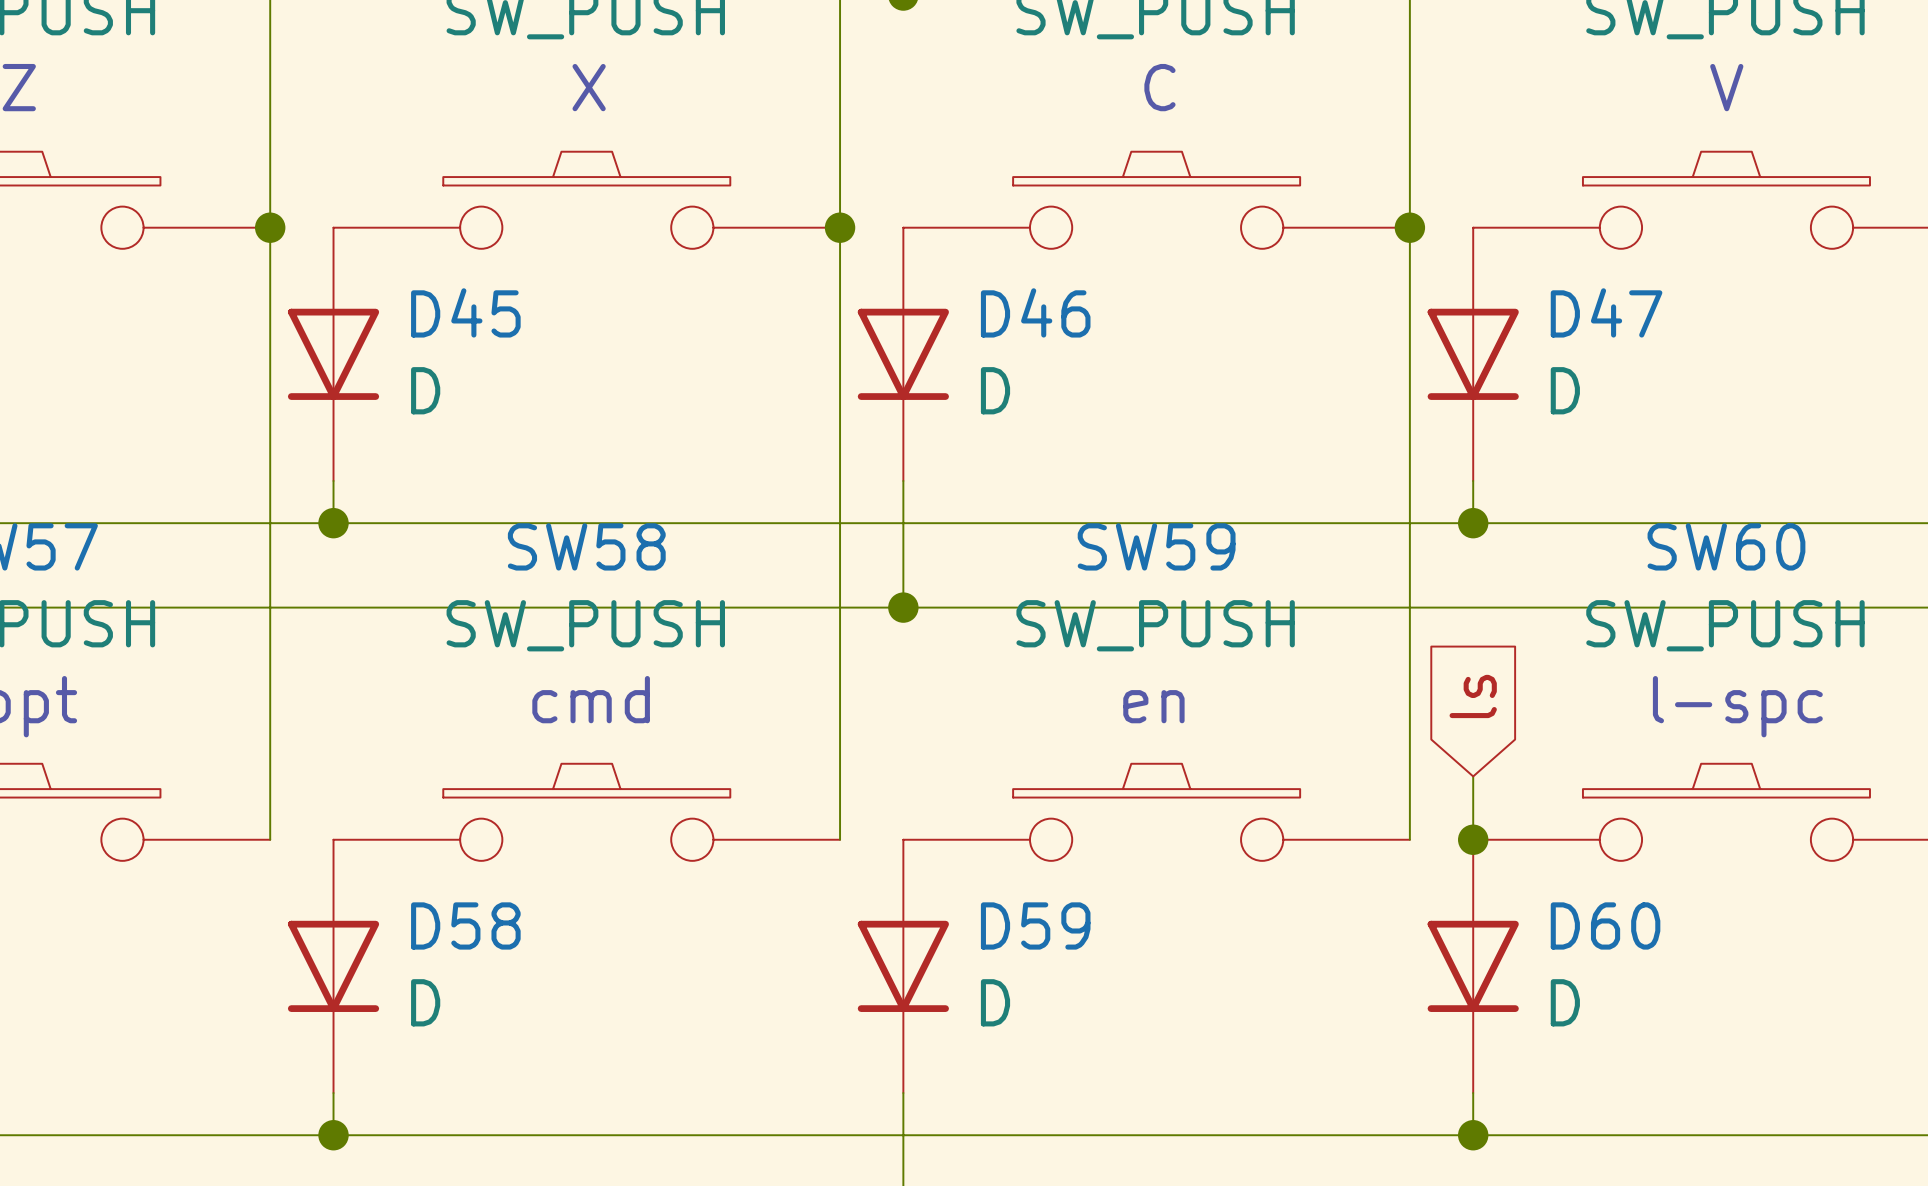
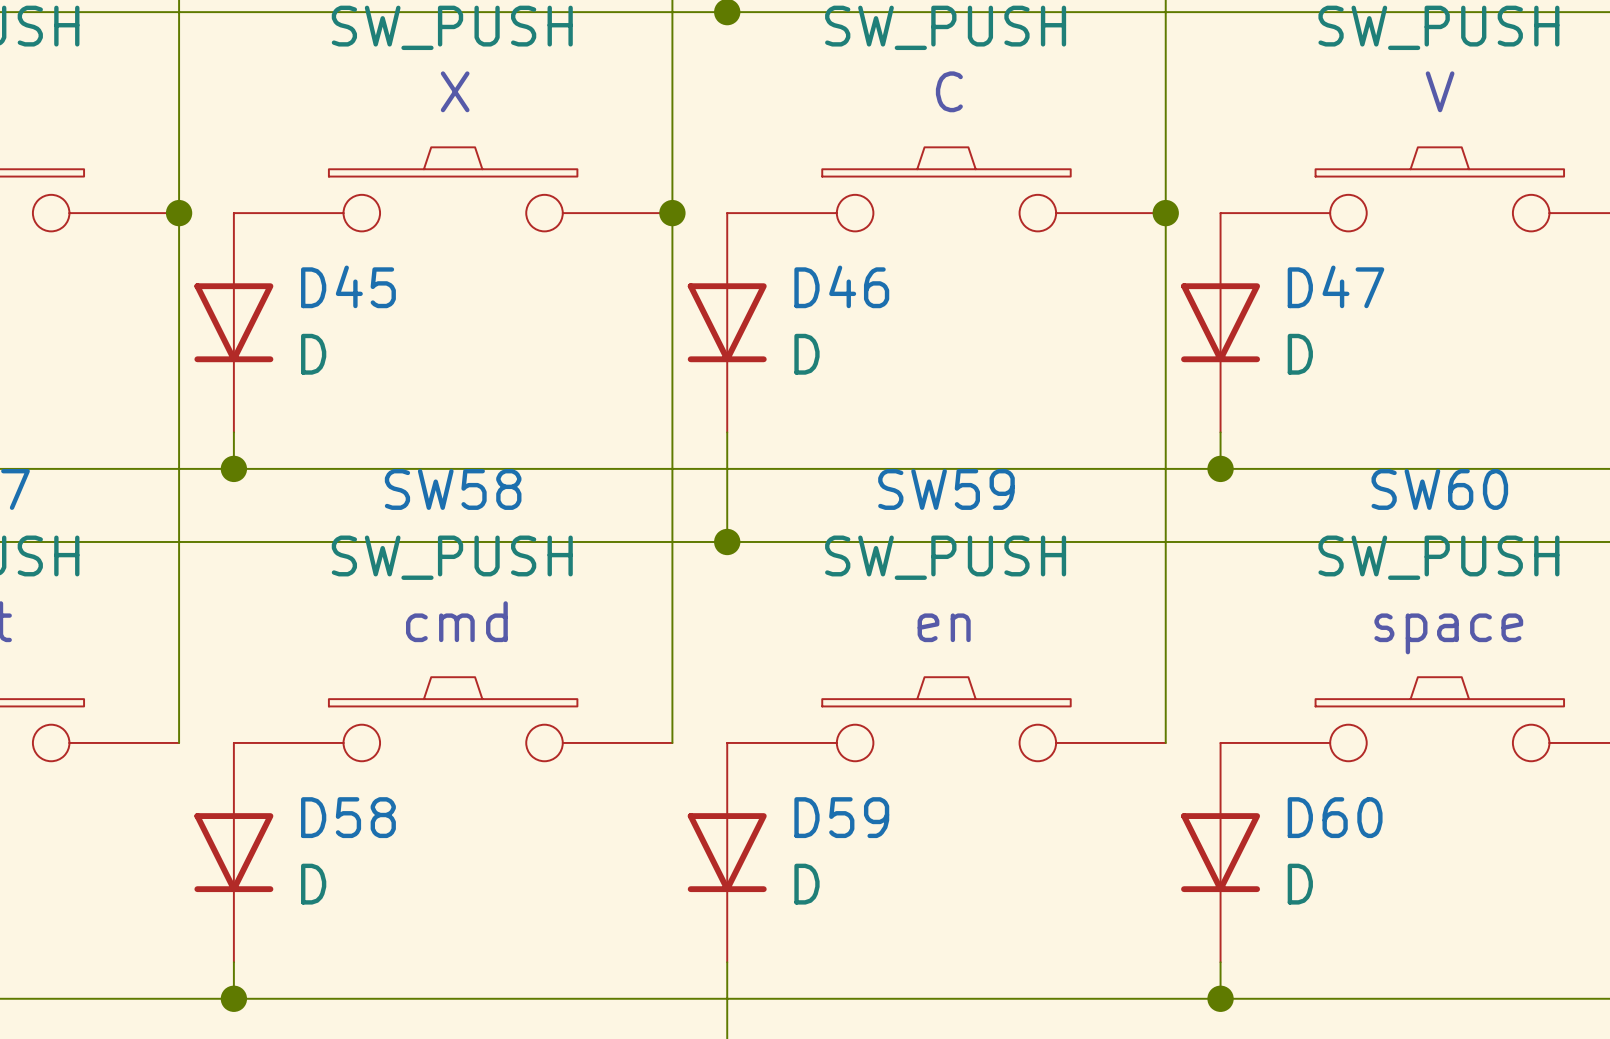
global label: ls (1473, 696) -> none
text: l-spc (1737, 706) -> space (1448, 633)
wire: (1473, 776) (1473, 839) -> none
junction: (1473, 839) -> none

